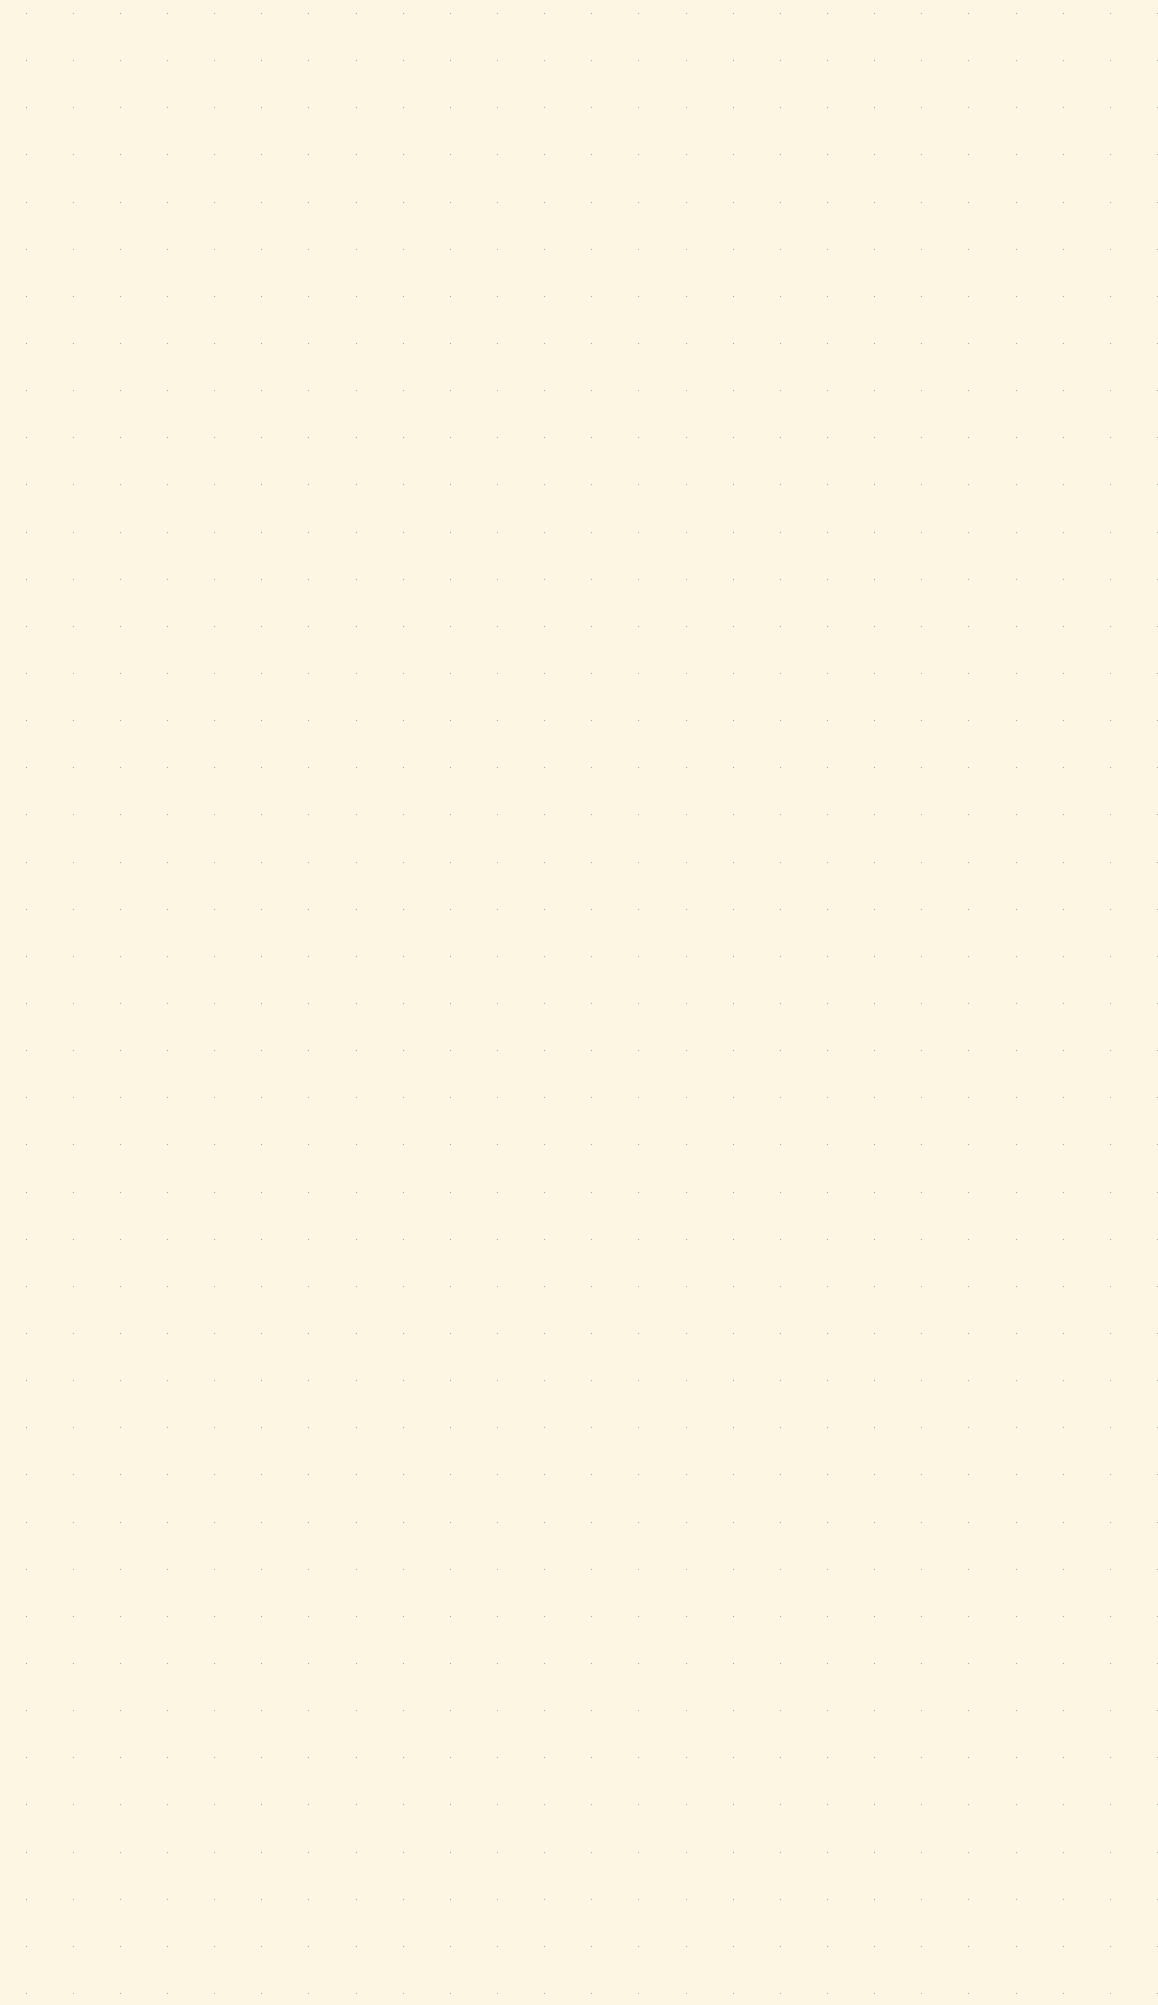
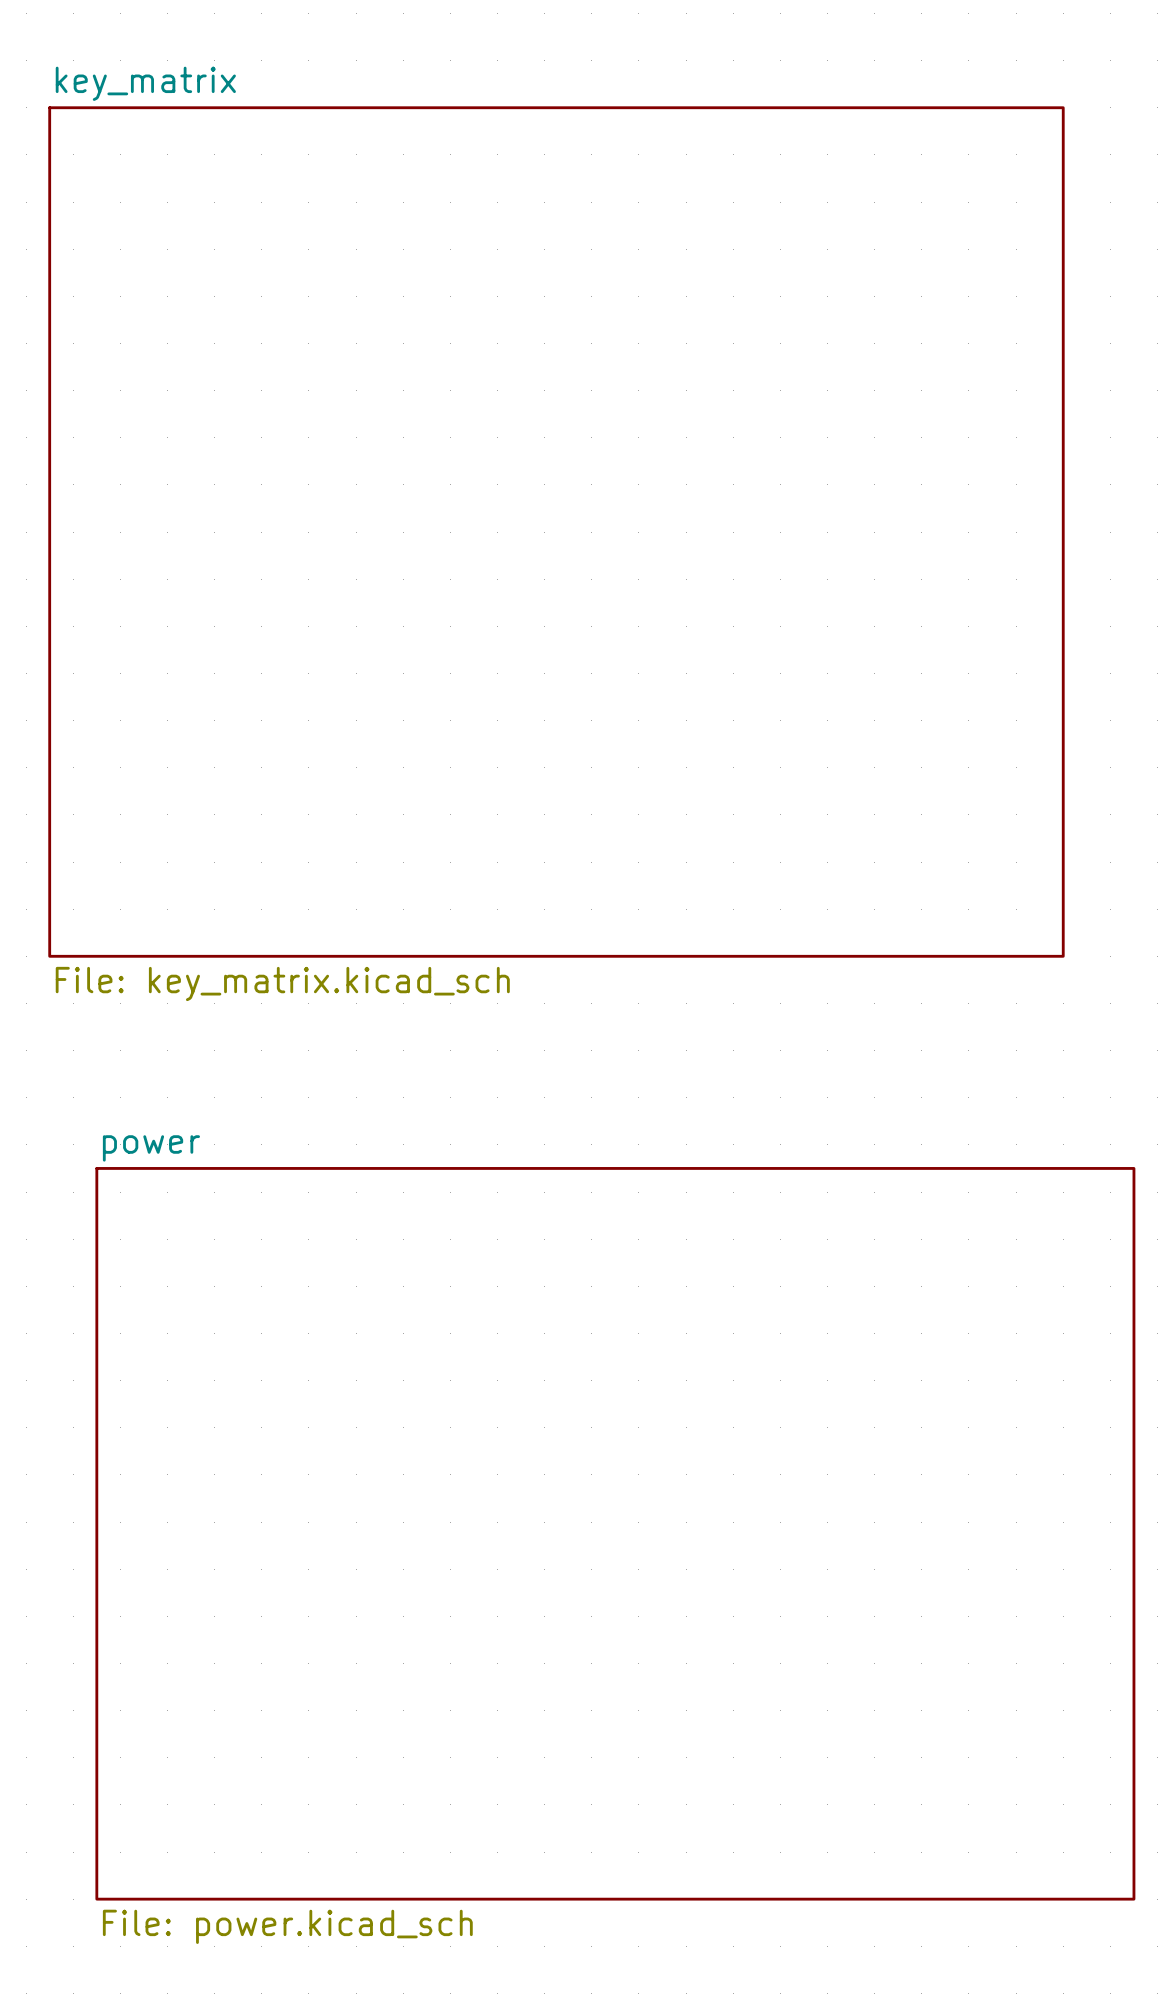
sheet key_matrix: none -> File: key_matrix.kicad_sch (556, 532)
sheet power: none -> File: power.kicad_sch (615, 1533)

